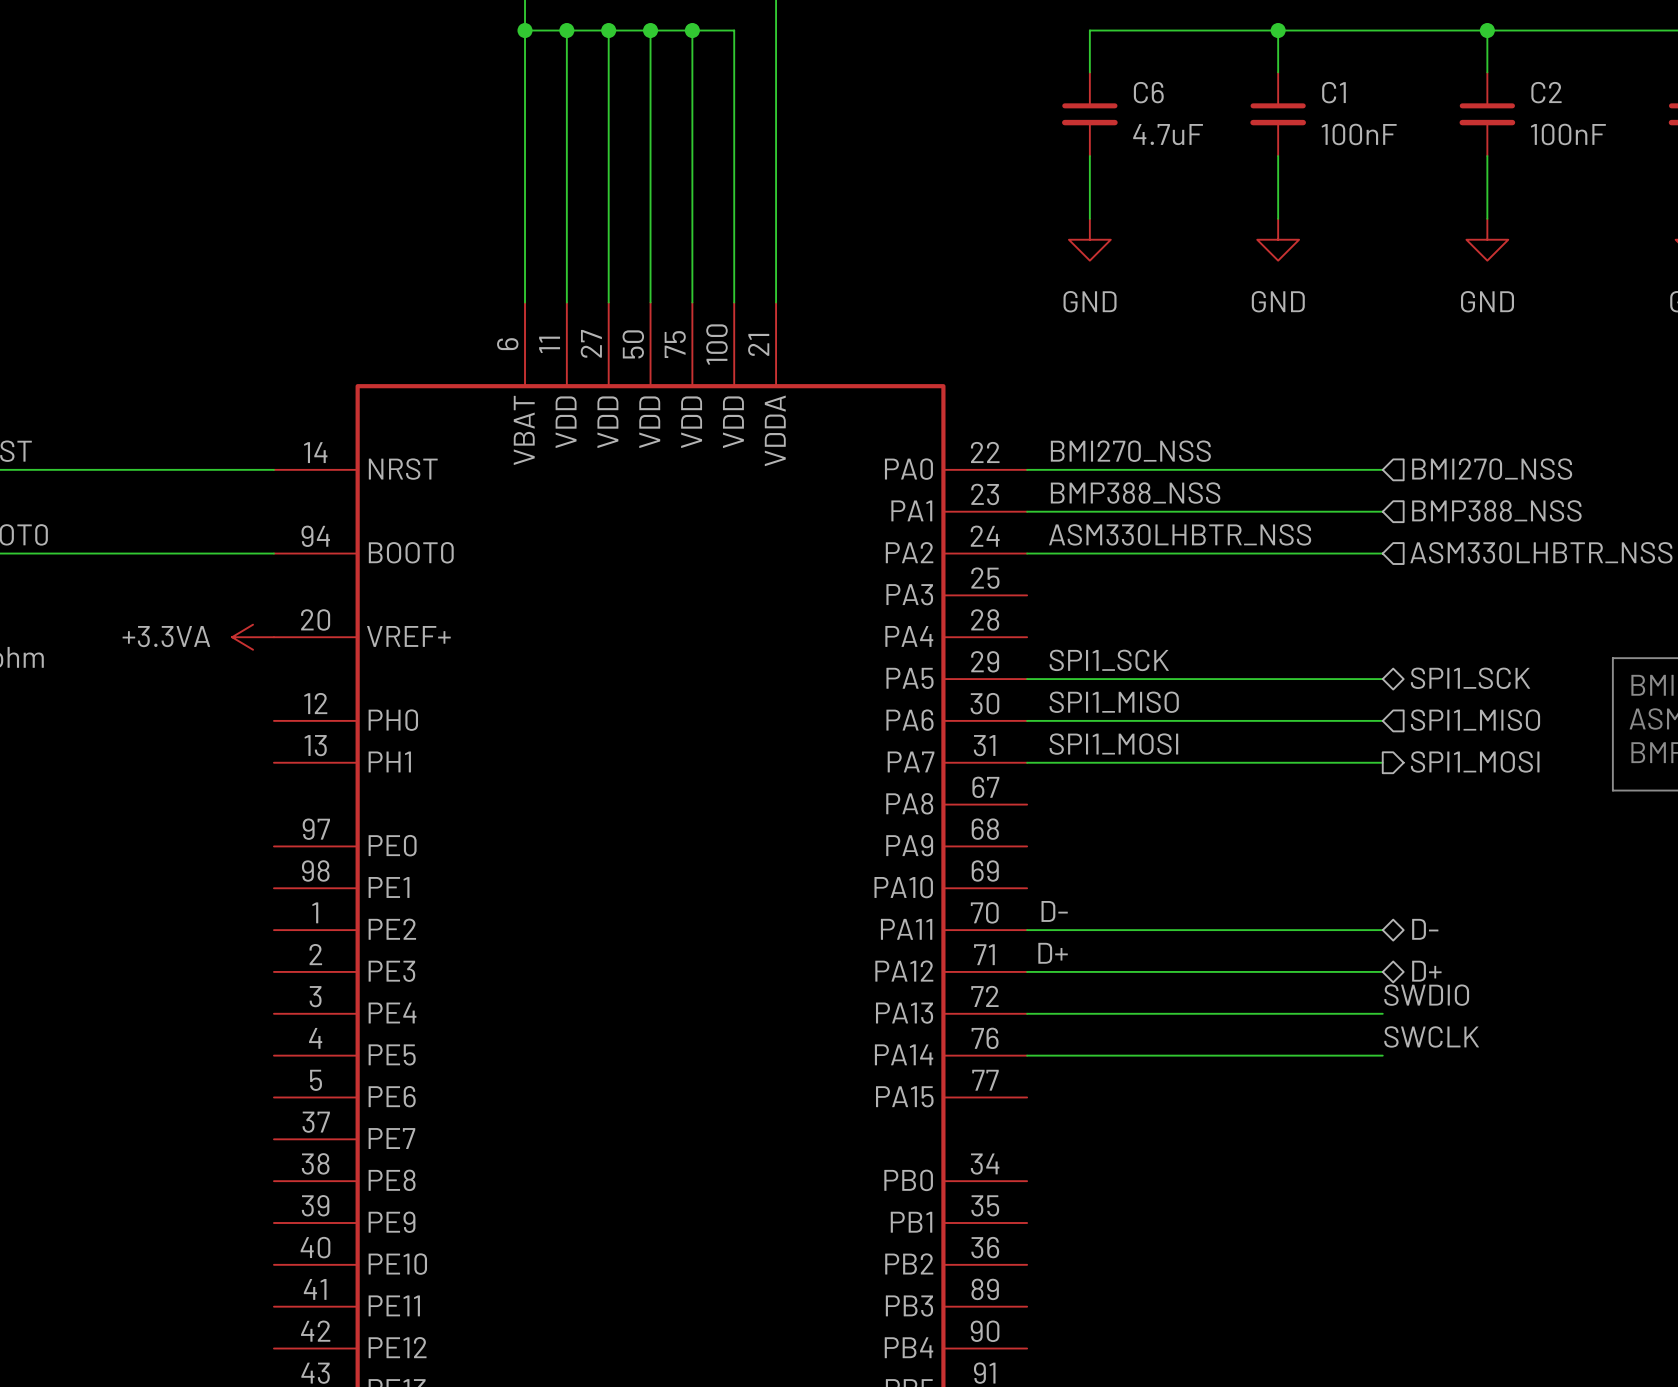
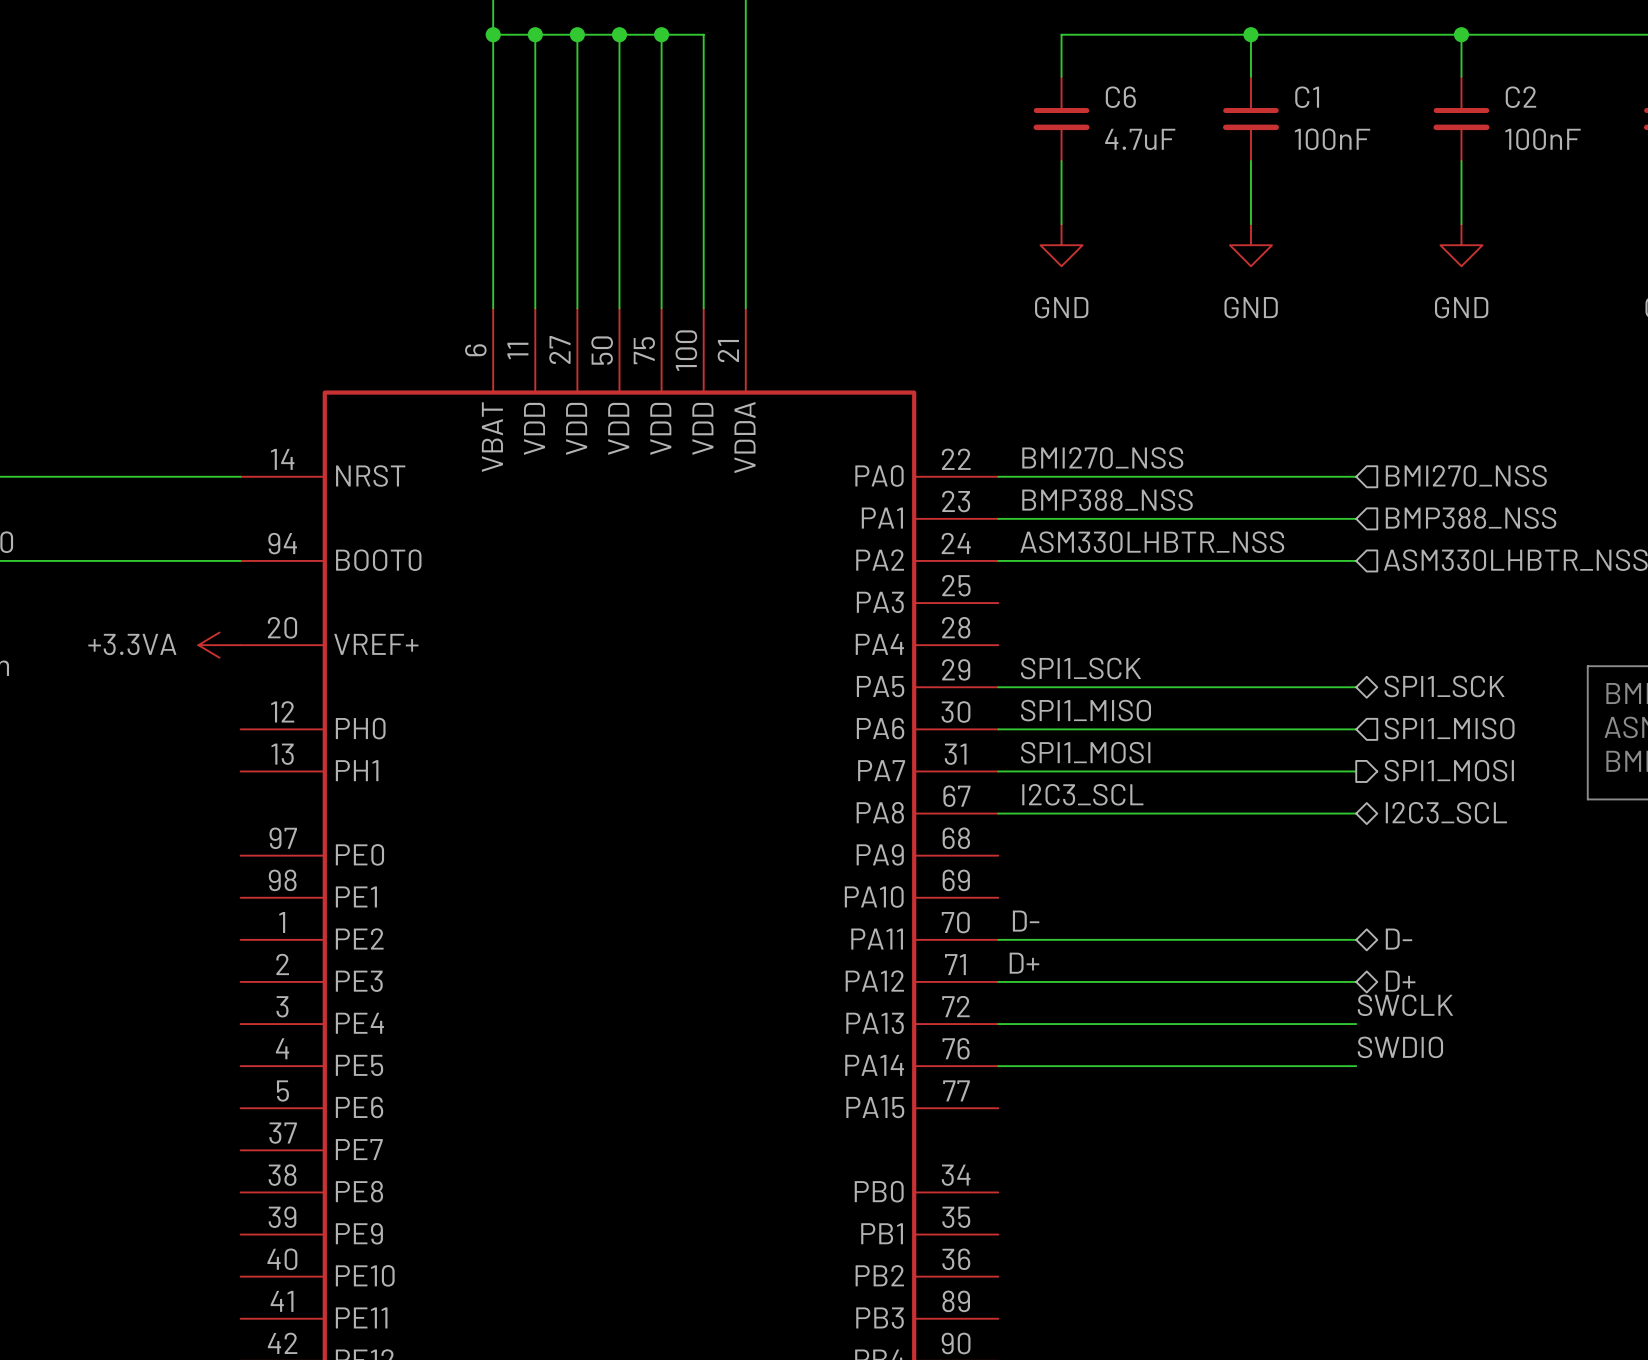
label: none -> I2C3_SCL (1082, 794)
hierarchical label: none -> I2C3_SCL (1446, 812)
wire: none -> (998, 813) (1356, 813)
label: SWDIO (1426, 995) -> SWCLK (1405, 1005)
label: SWCLK (1431, 1036) -> SWDIO (1400, 1047)

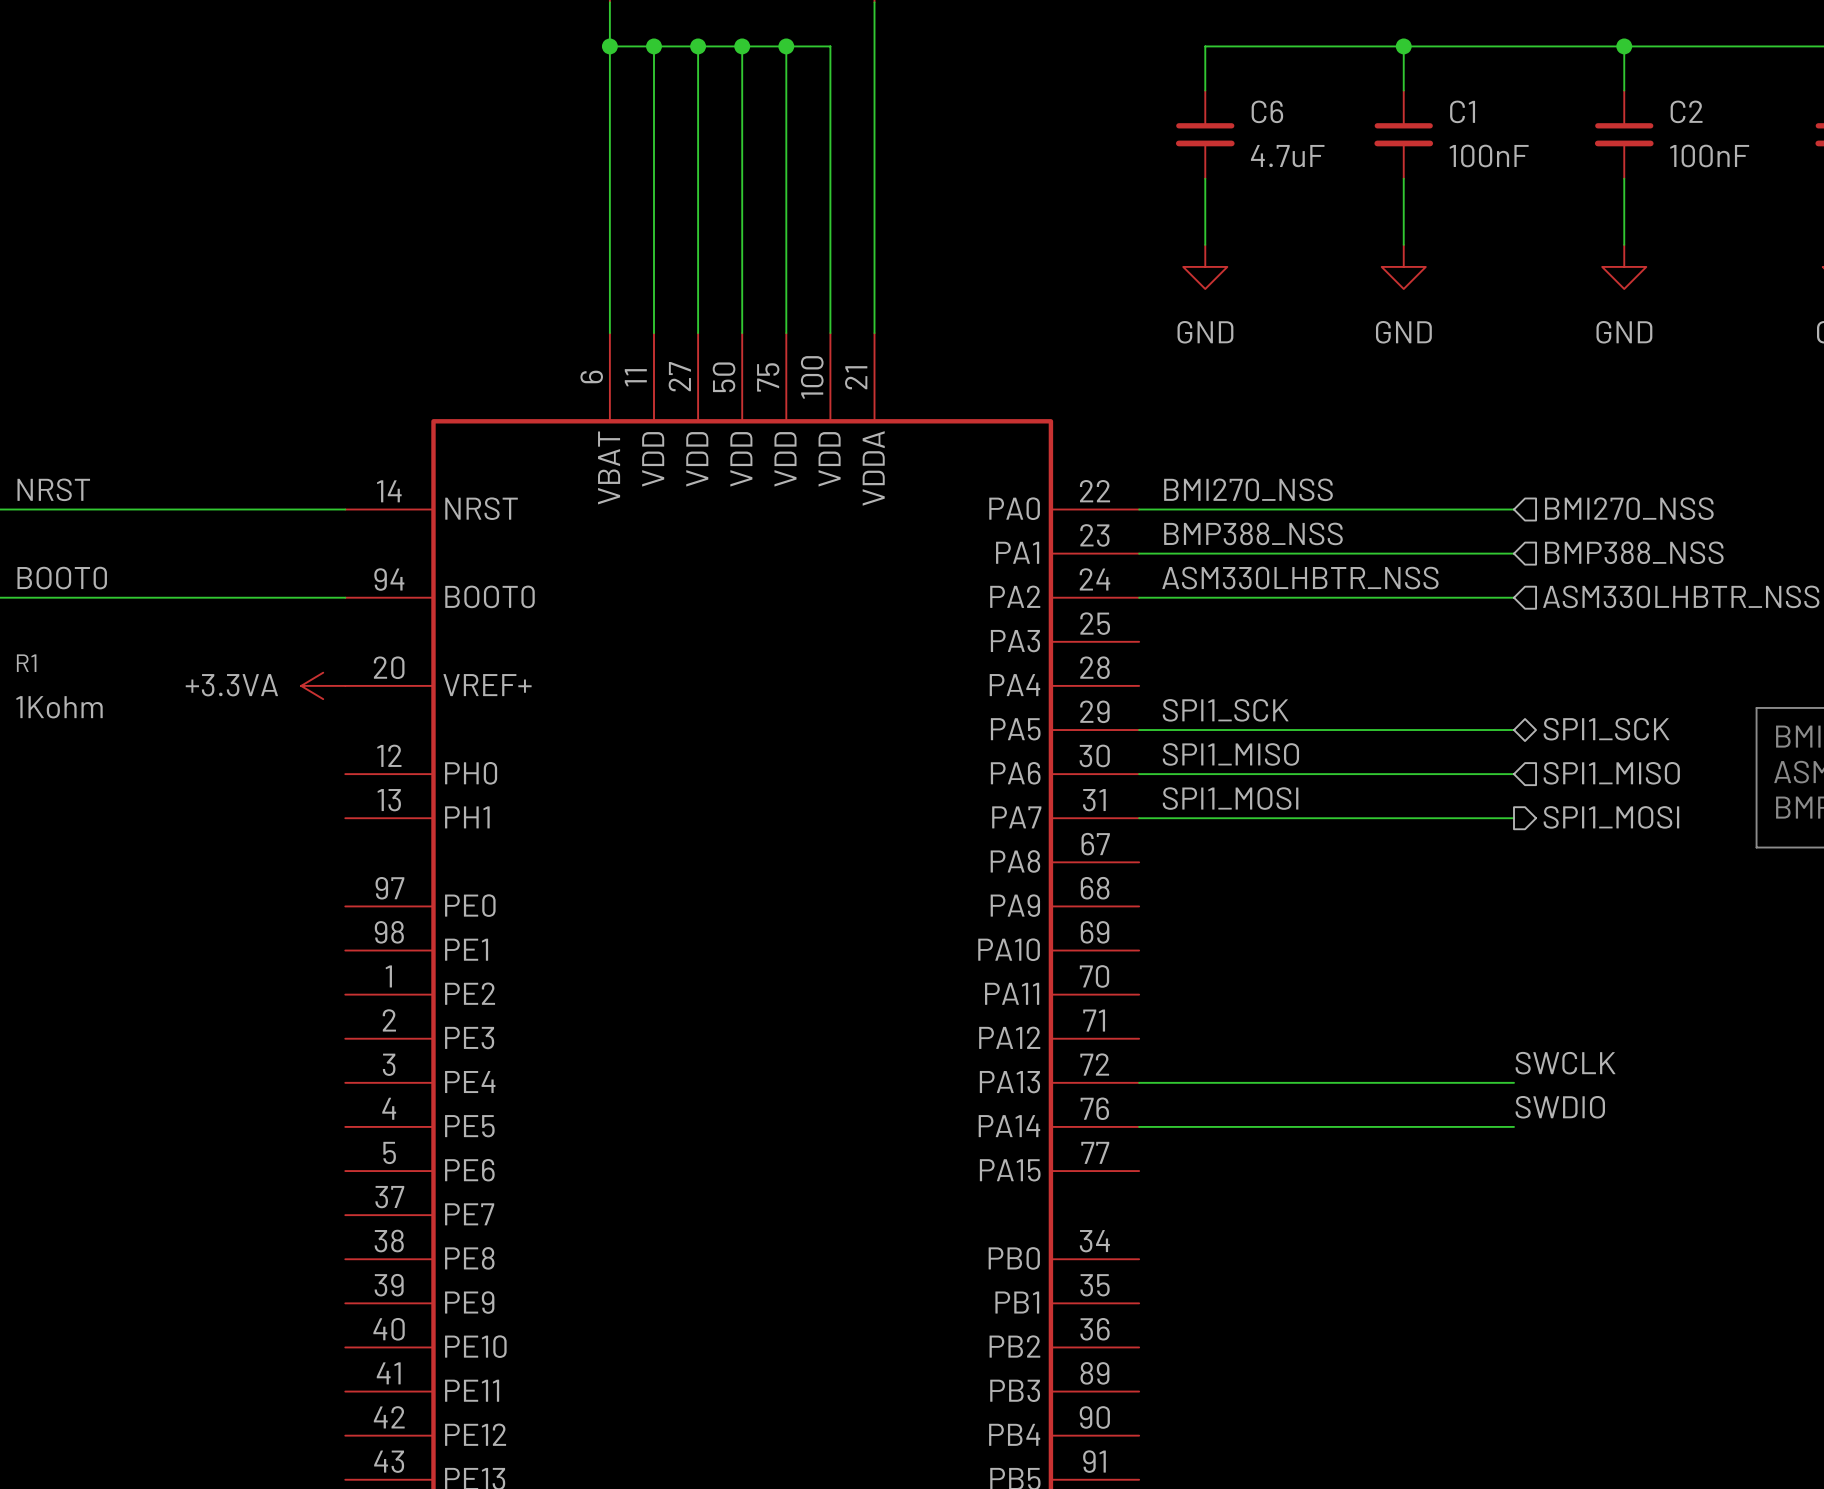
label: I2C3_SCL (1082, 794) -> none
hierarchical label: I2C3_SCL (1446, 812) -> none
wire: (998, 813) (1356, 813) -> none
label: D- (1026, 921) -> none
wire: (998, 939) (1356, 939) -> none
hierarchical label: D- (1399, 939) -> none
label: D+ (1024, 963) -> none
wire: (998, 981) (1356, 981) -> none
hierarchical label: D+ (1400, 981) -> none

